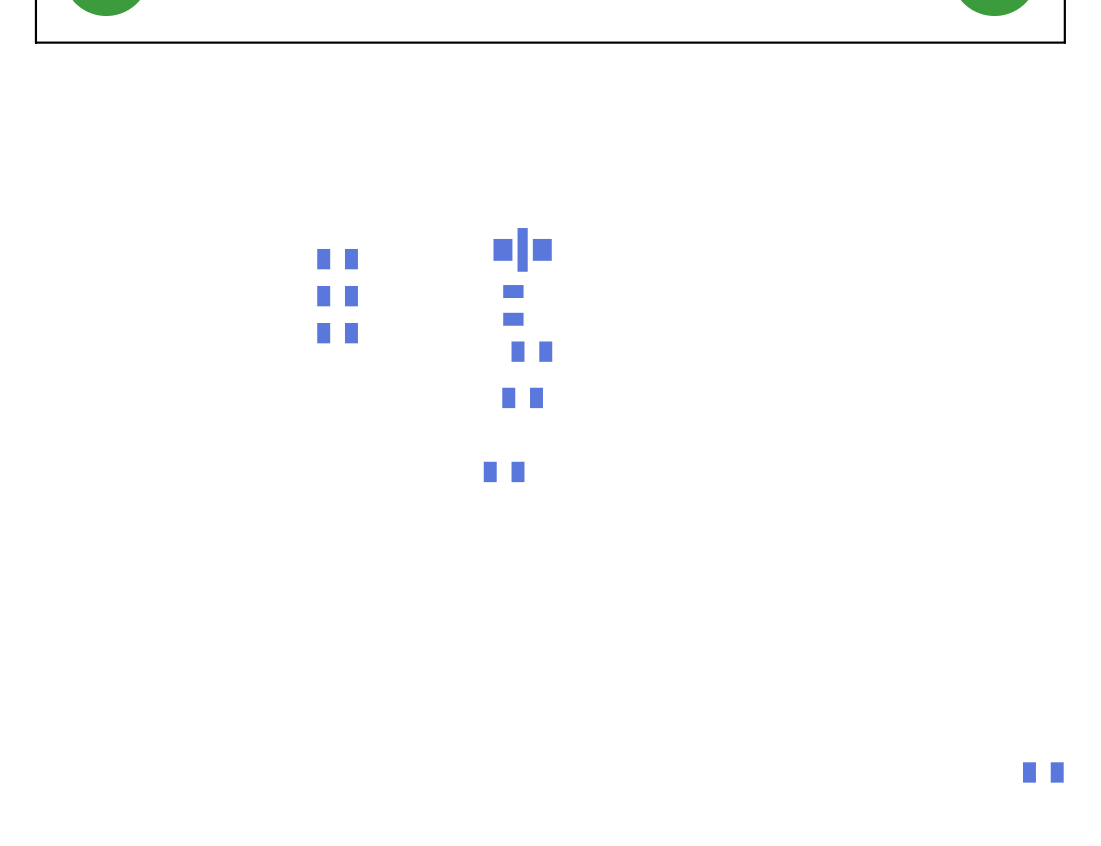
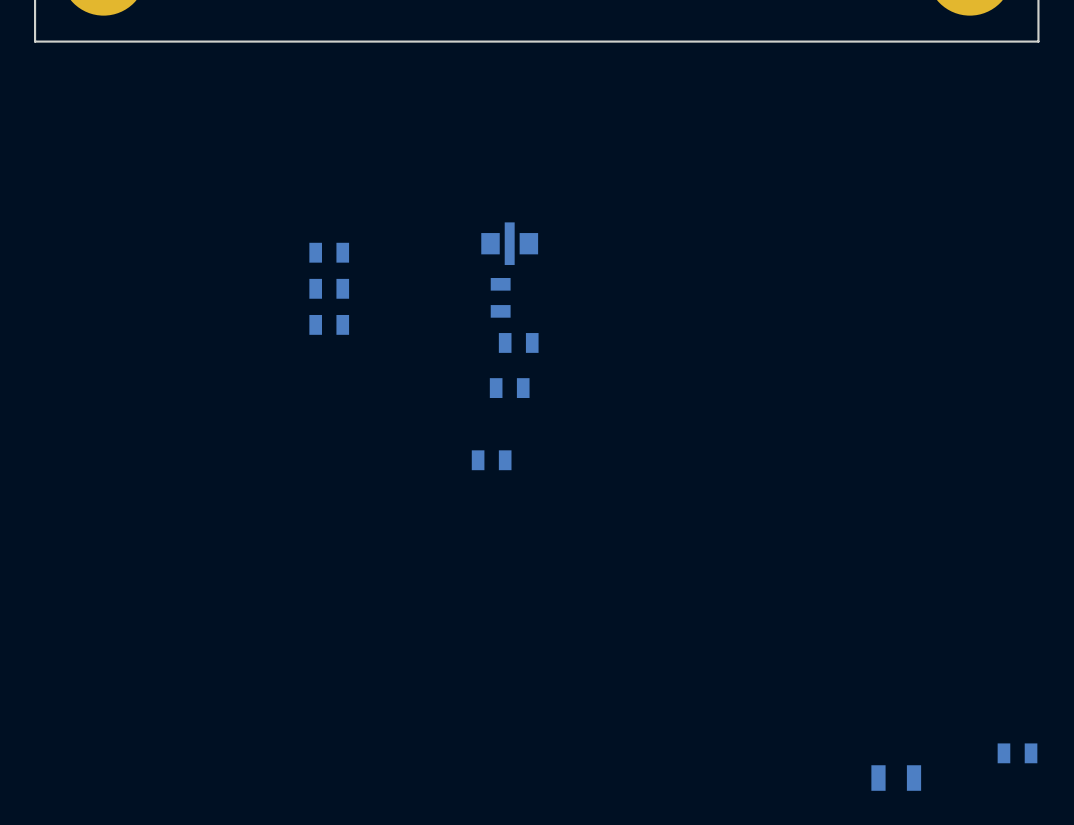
part: none -> (896, 778)

